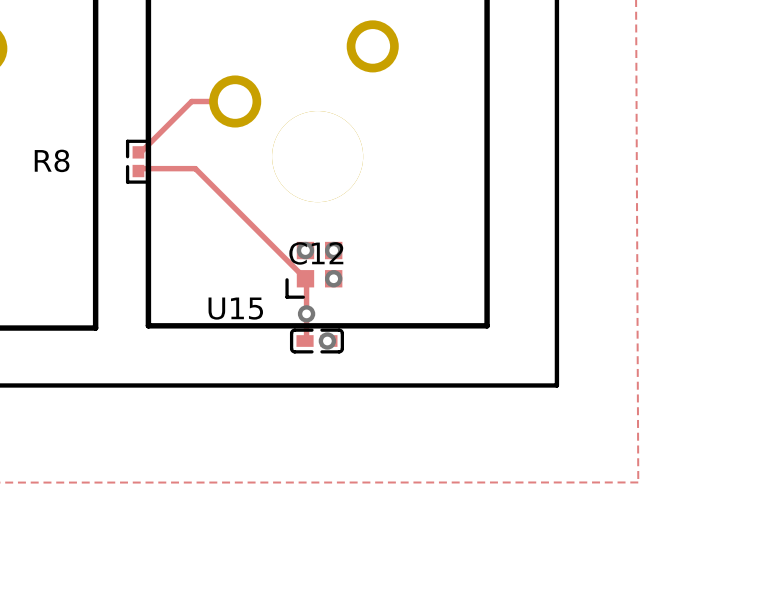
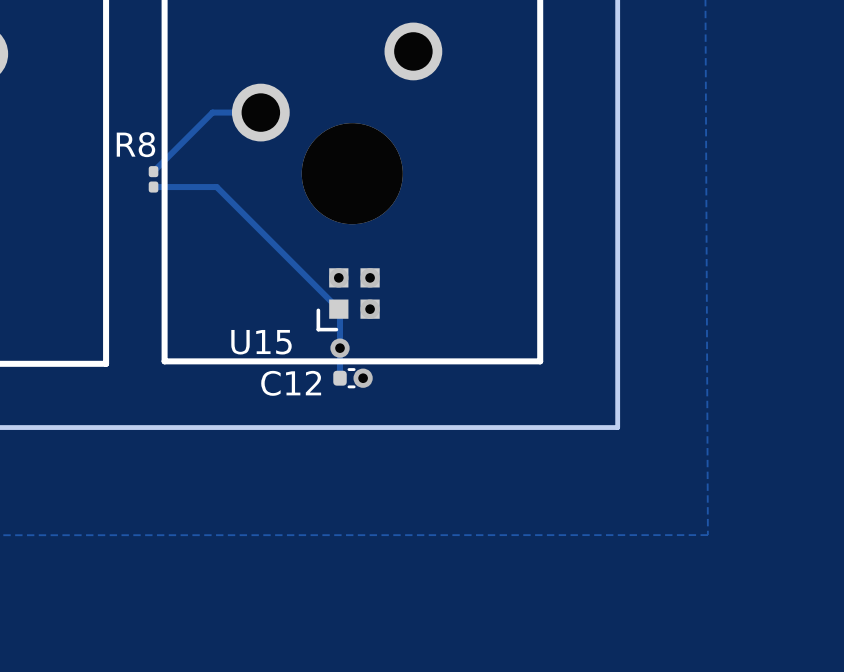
R8 footprint: [125, 139, 151, 184] -> [148, 166, 159, 193]
R8 name position: R8 (52, 160) -> R8 (135, 144)
C12 name position: C12 (316, 253) -> C12 (291, 383)
C12 footprint: [289, 328, 344, 354] -> [333, 368, 370, 389]

